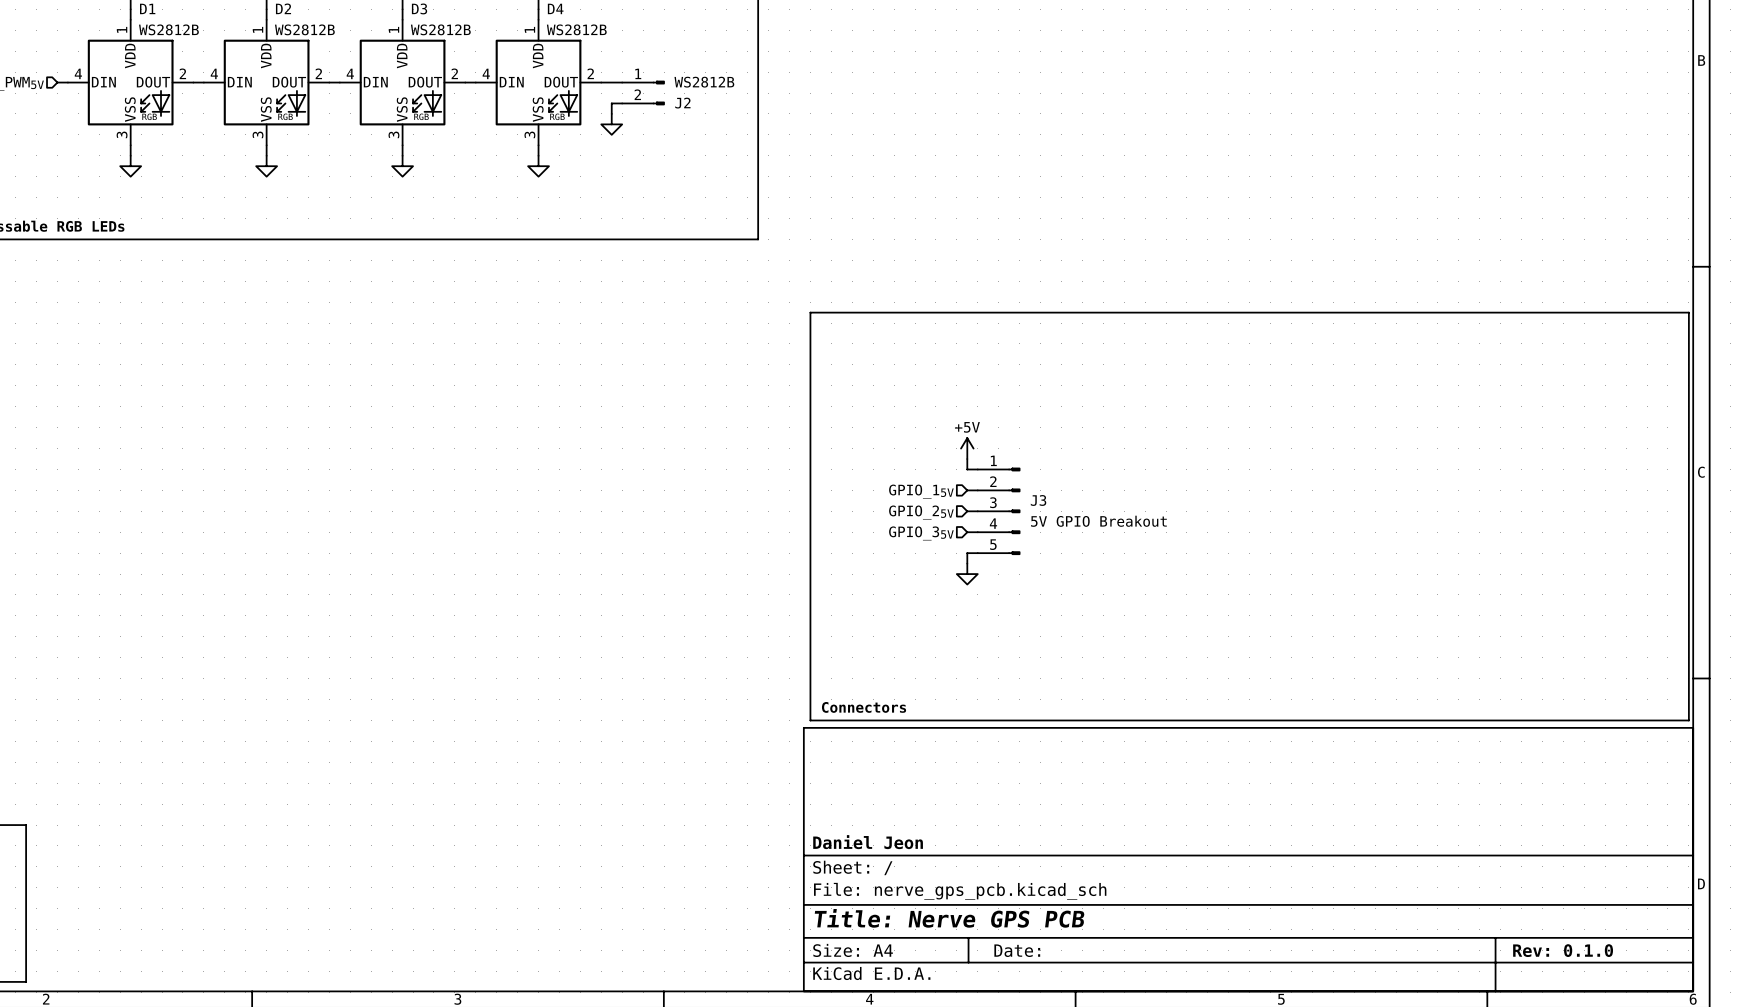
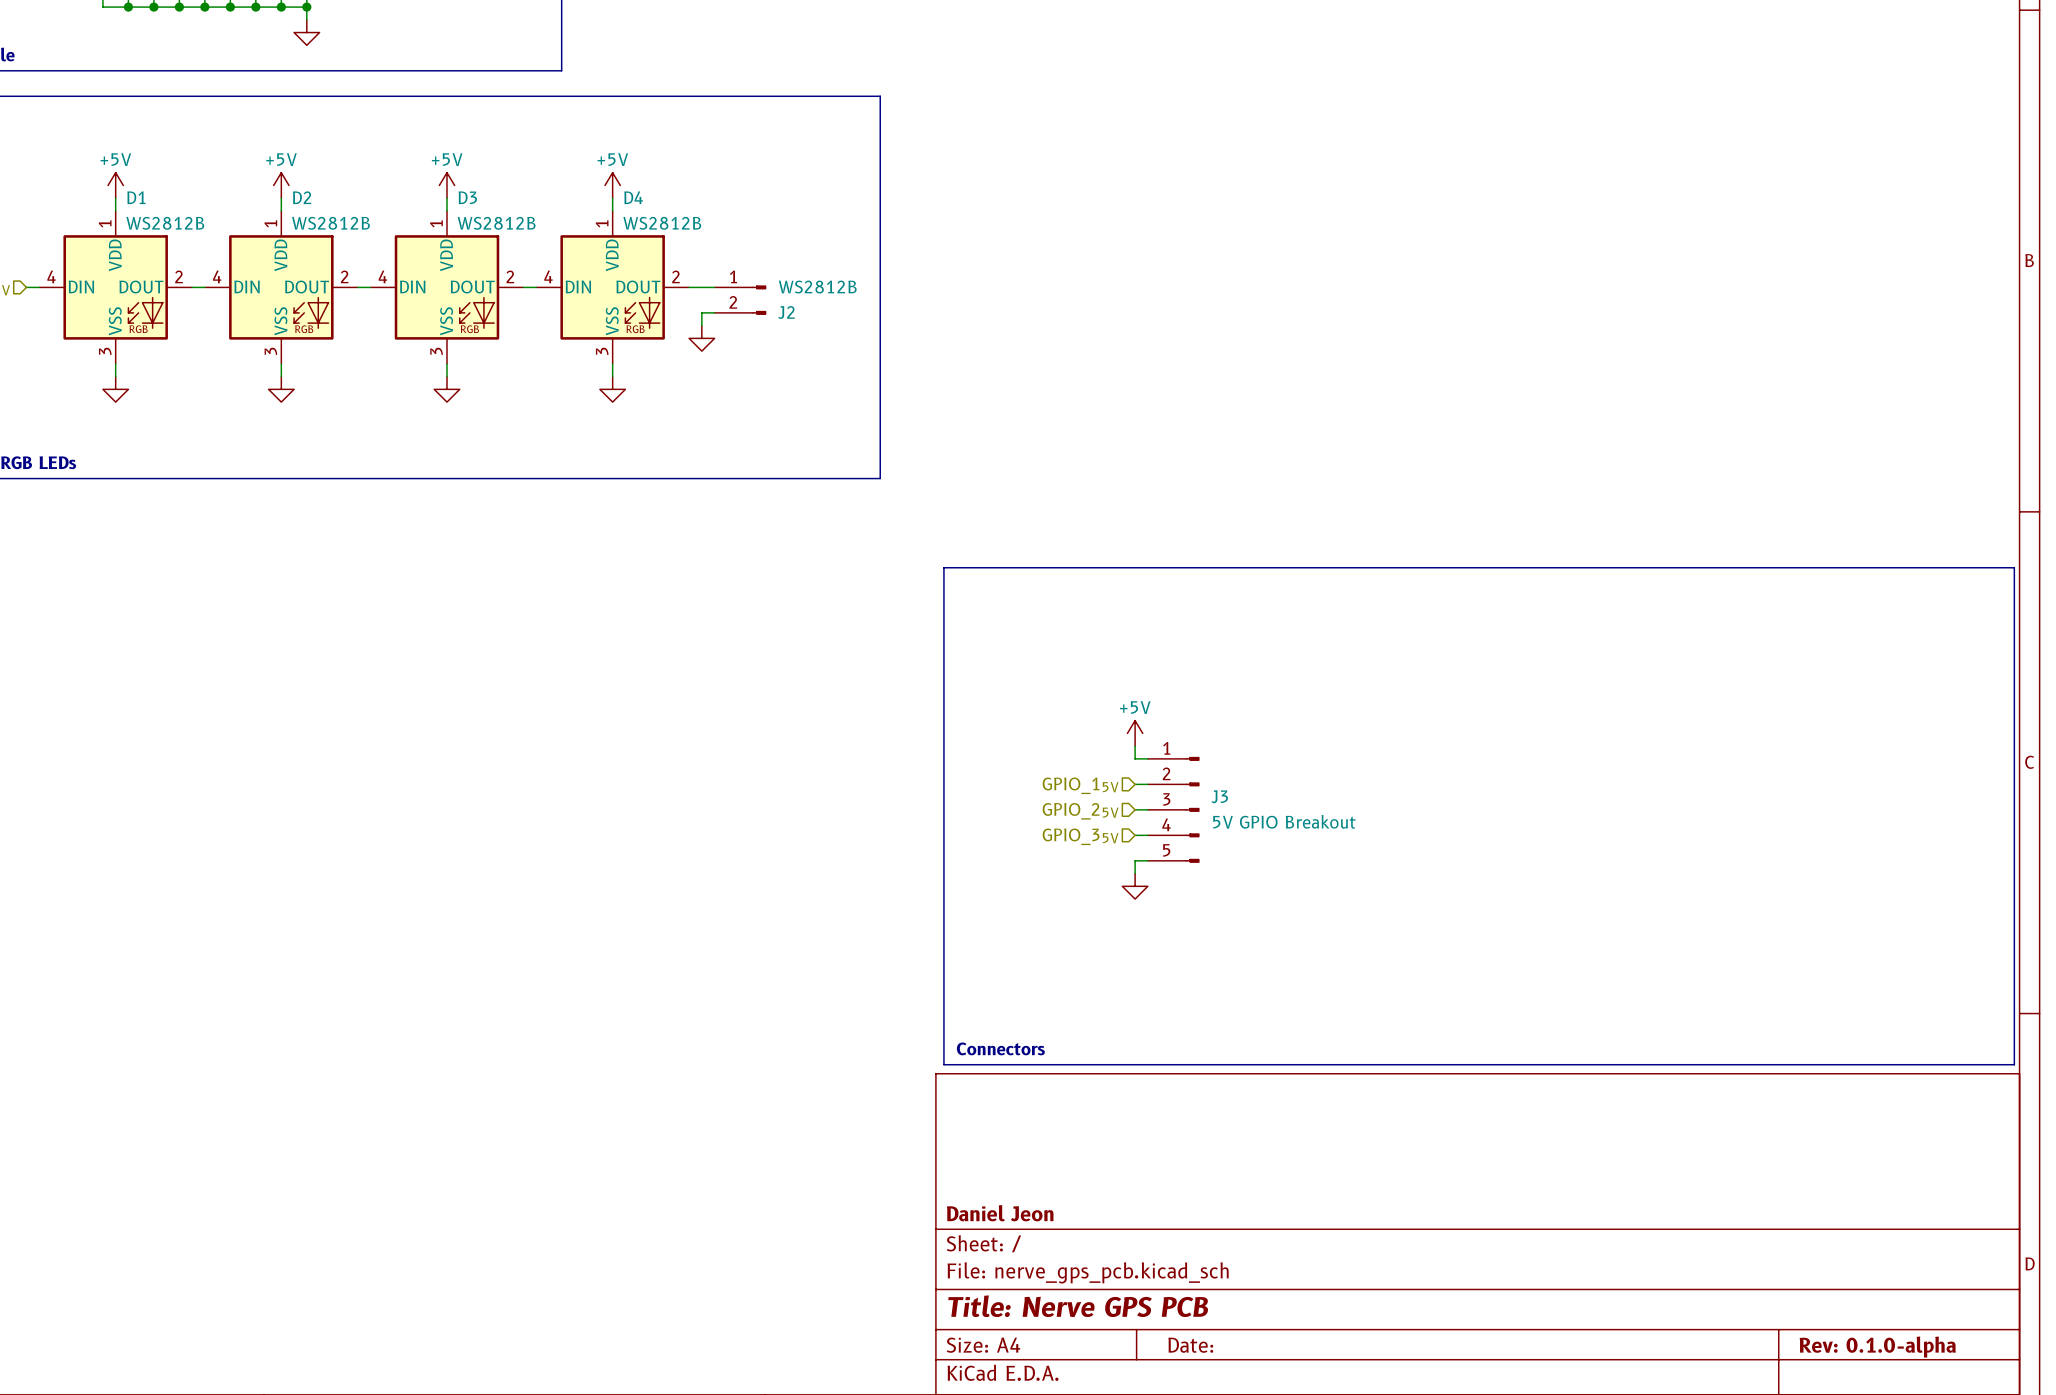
title block: Rev: 0.1.0 (1563, 950) -> Rev: 0.1.0-alpha (1877, 1347)

